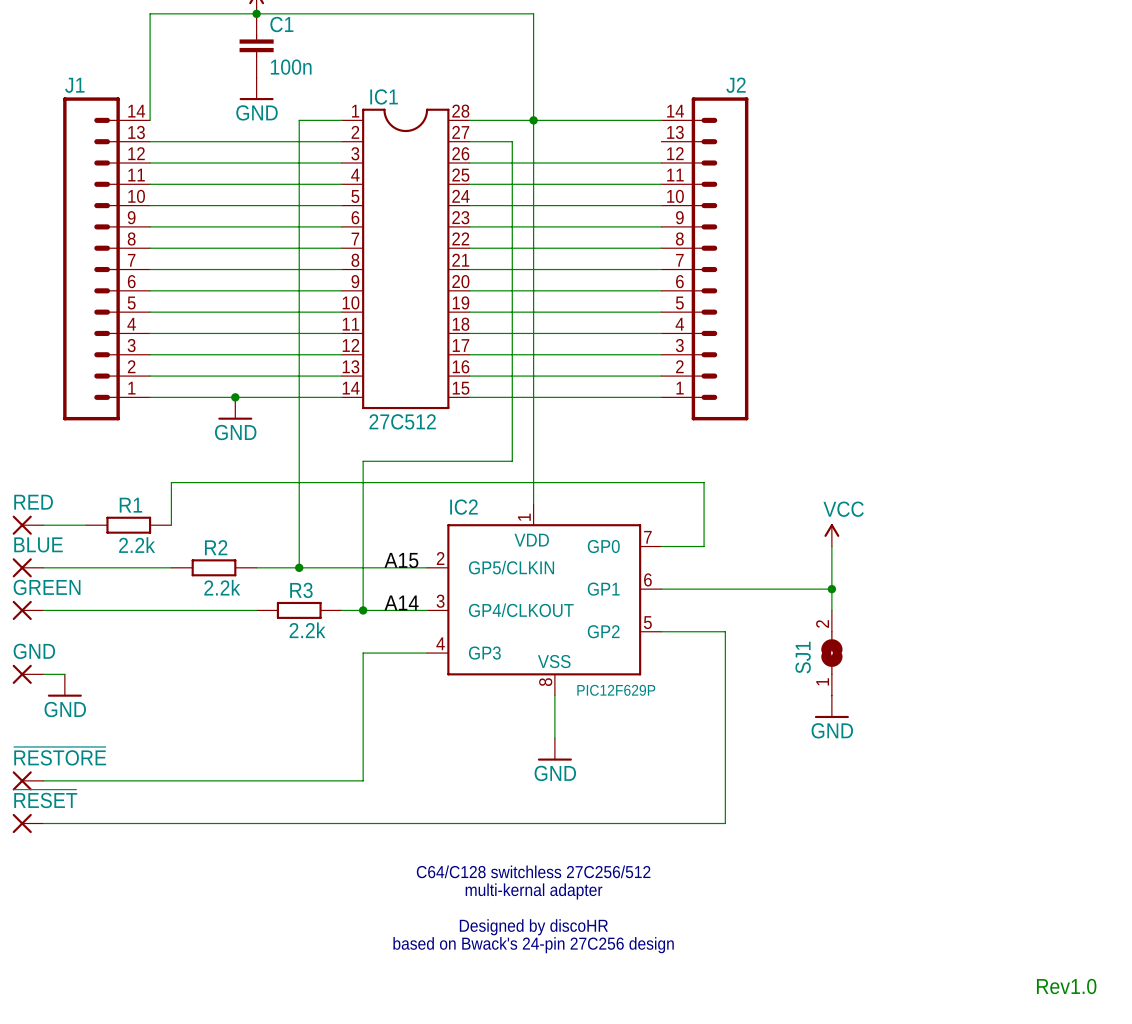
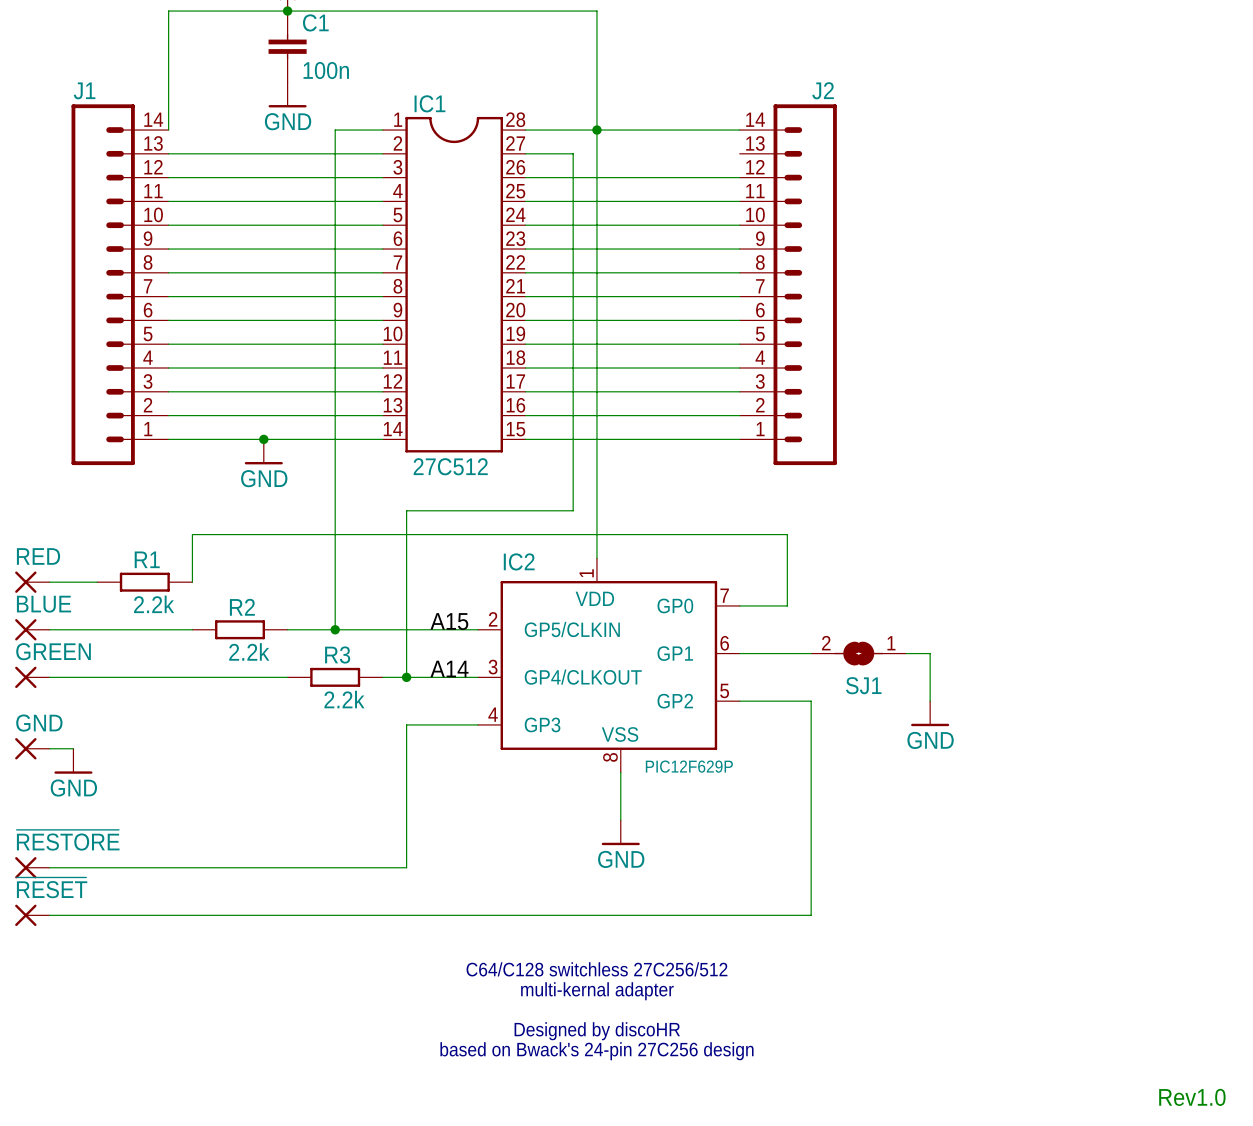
power symbol: VCC (831, 535) -> none
wire: (831, 546) (831, 589) -> none
junction: (831, 589) -> none
SJ1 rotation: 0° (831, 653) -> 90° counterclockwise (858, 653)
SJ1 position: (831, 653) -> (858, 653)
power symbol position: GND (831, 706) -> GND (930, 713)

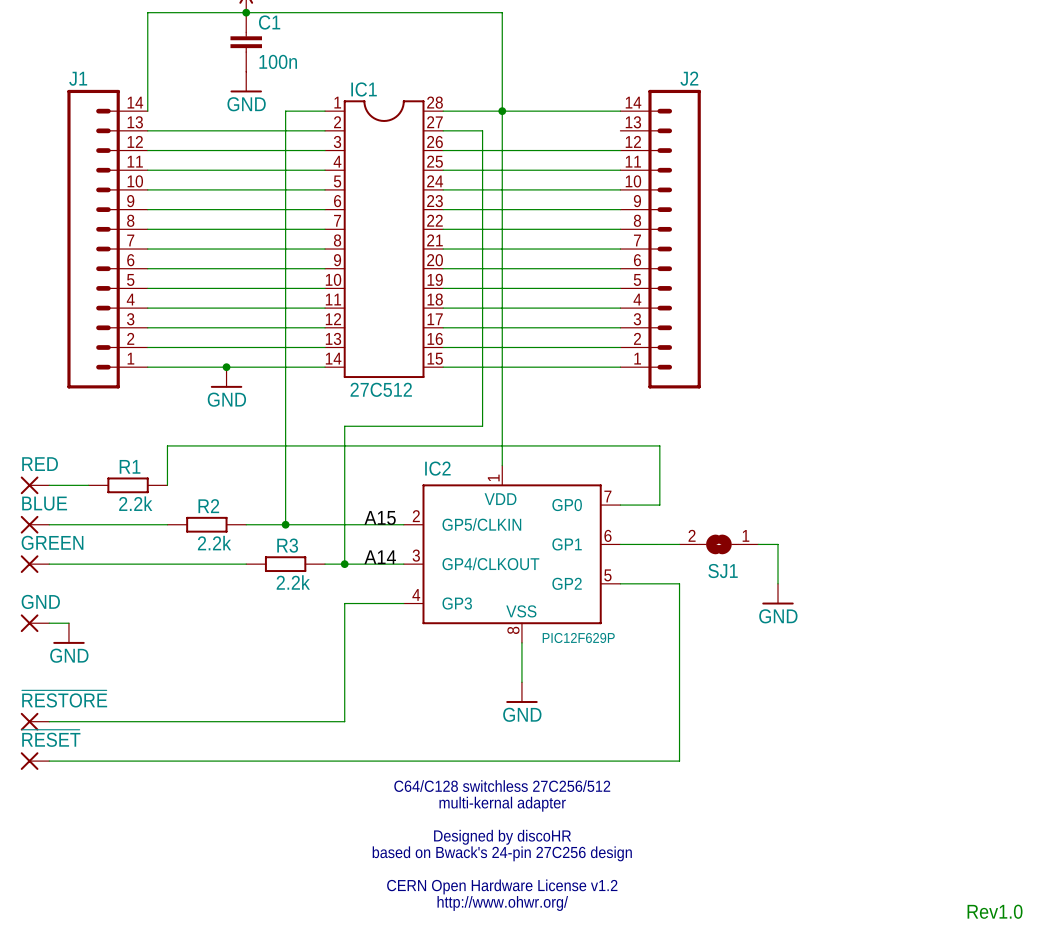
text: none -> C64/C128 switchless 27C256/512 (502, 786)
text: C64/C128 switchless 27C256/512 (596, 969) -> multi-kernal adapter (502, 804)
text: multi-kernal adapter (597, 991) -> none
text: none -> Designed by discoHR (502, 837)
text: Designed by discoHR (597, 1031) -> based on Bwack's 24-pin 27C256 design (502, 853)
text: based on Bwack's 24-pin 27C256 design (596, 1051) -> none
text: none -> CERN Open Hardware License v1.2 (502, 886)
text: none -> http://www.ohwr.org/ (502, 903)

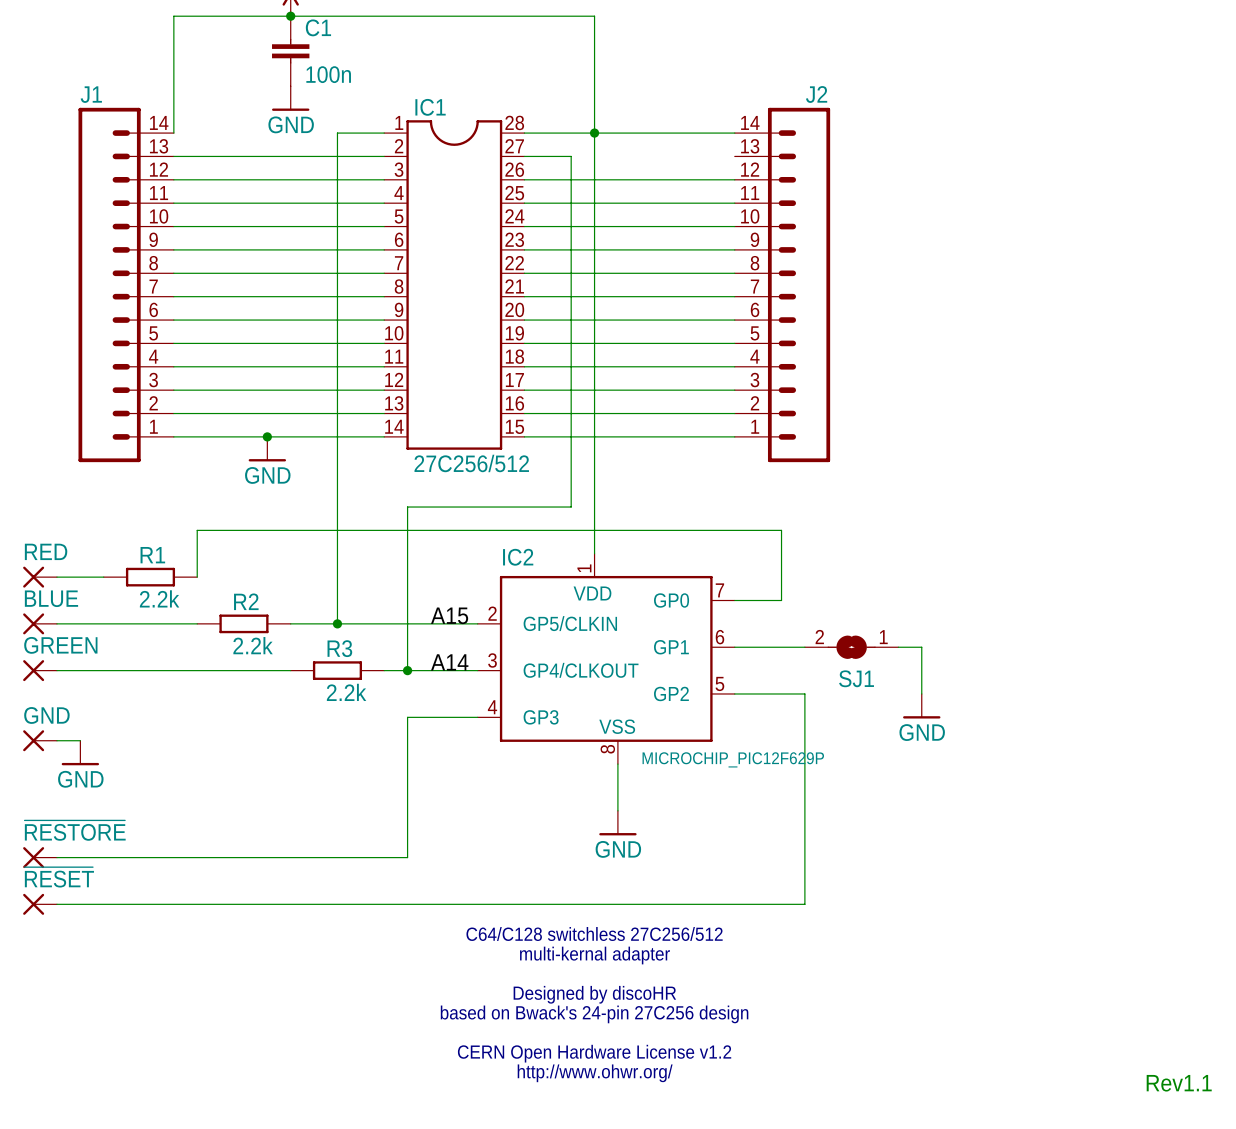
IC1 value: 27C512 (381, 389) -> 27C256/512 (471, 463)
IC2 value: PIC12F629P (578, 637) -> MICROCHIP_PIC12F629P (733, 759)
text: Rev1.0 (995, 911) -> Rev1.1 (1179, 1083)

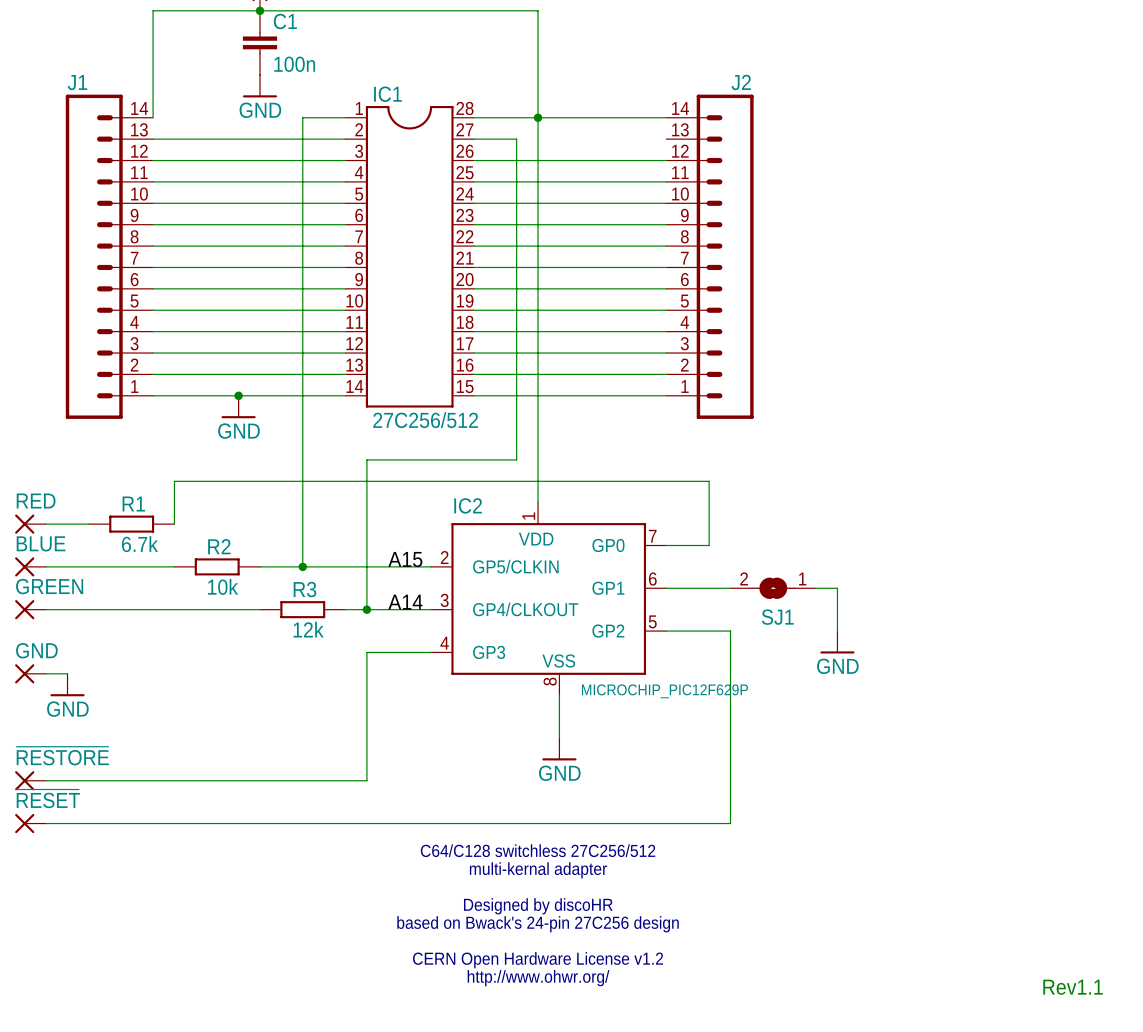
R1 value: 2.2k (159, 598) -> 6.7k (140, 544)
R2 value: 2.2k (253, 645) -> 10k (223, 586)
R3 value: 2.2k (346, 692) -> 12k (308, 629)

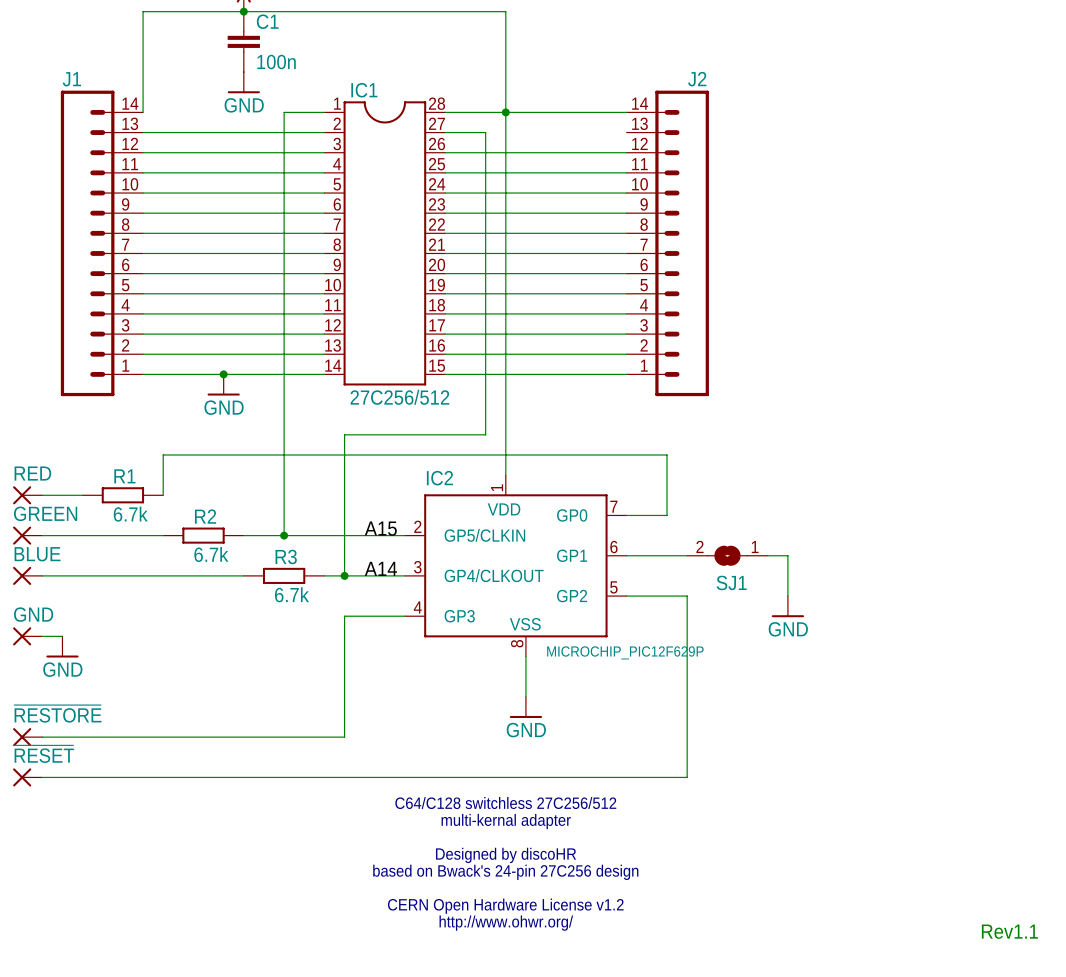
BLUE name: BLUE (41, 543) -> GREEN (45, 513)
GREEN name: GREEN (49, 586) -> BLUE (37, 554)
R2 value: 10k (223, 586) -> 6.7k (211, 554)
R3 value: 12k (308, 629) -> 6.7k (291, 594)

